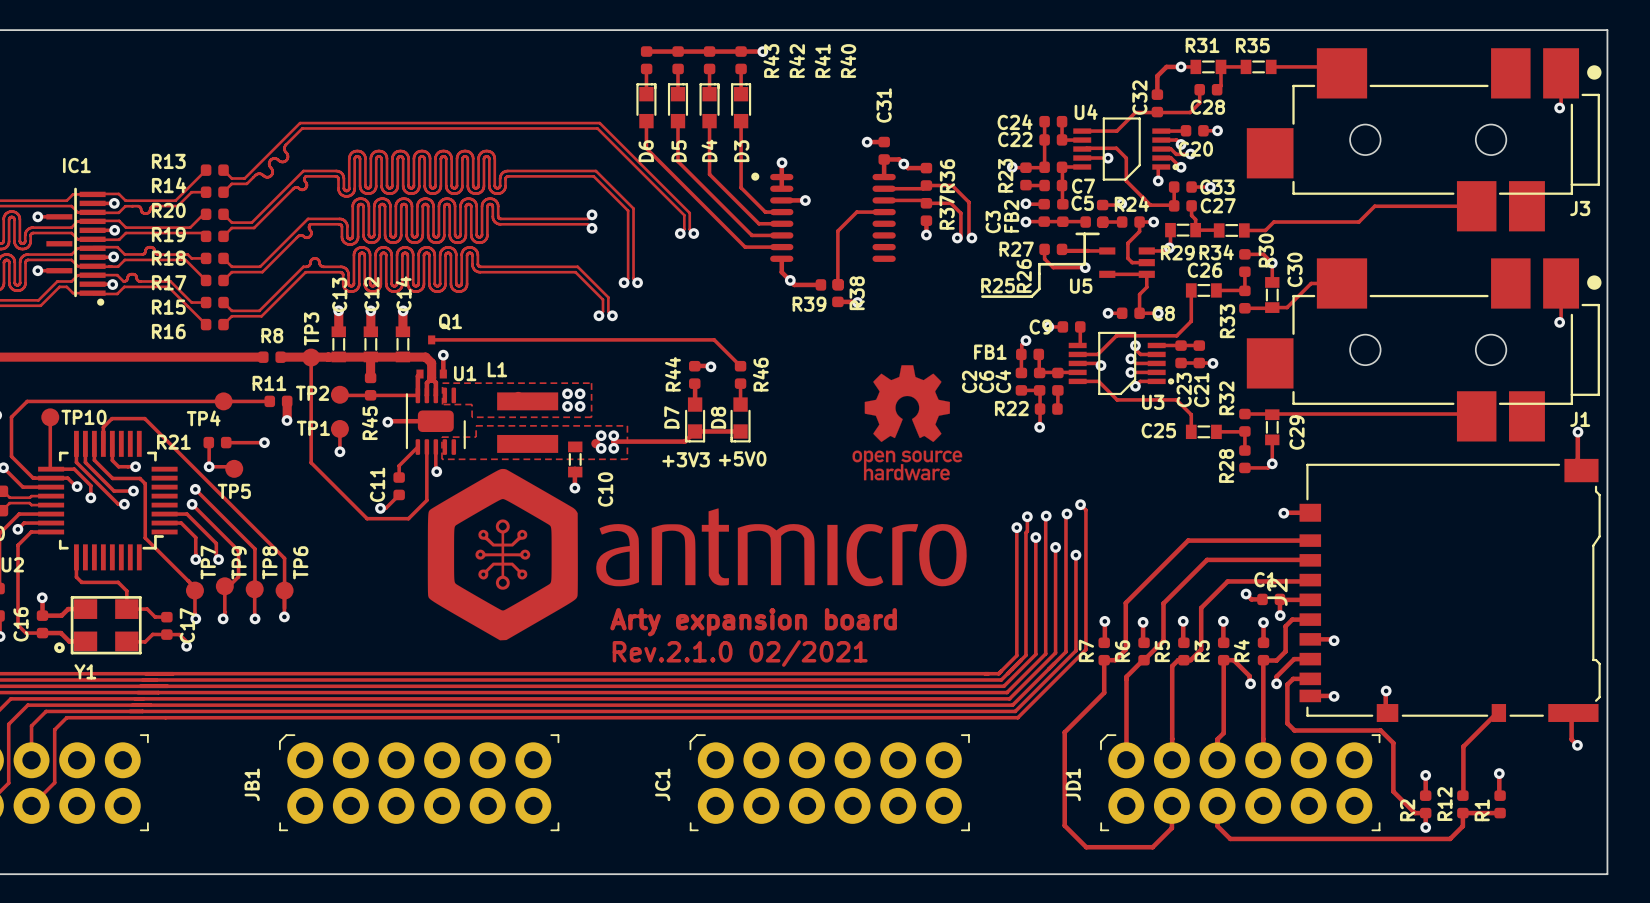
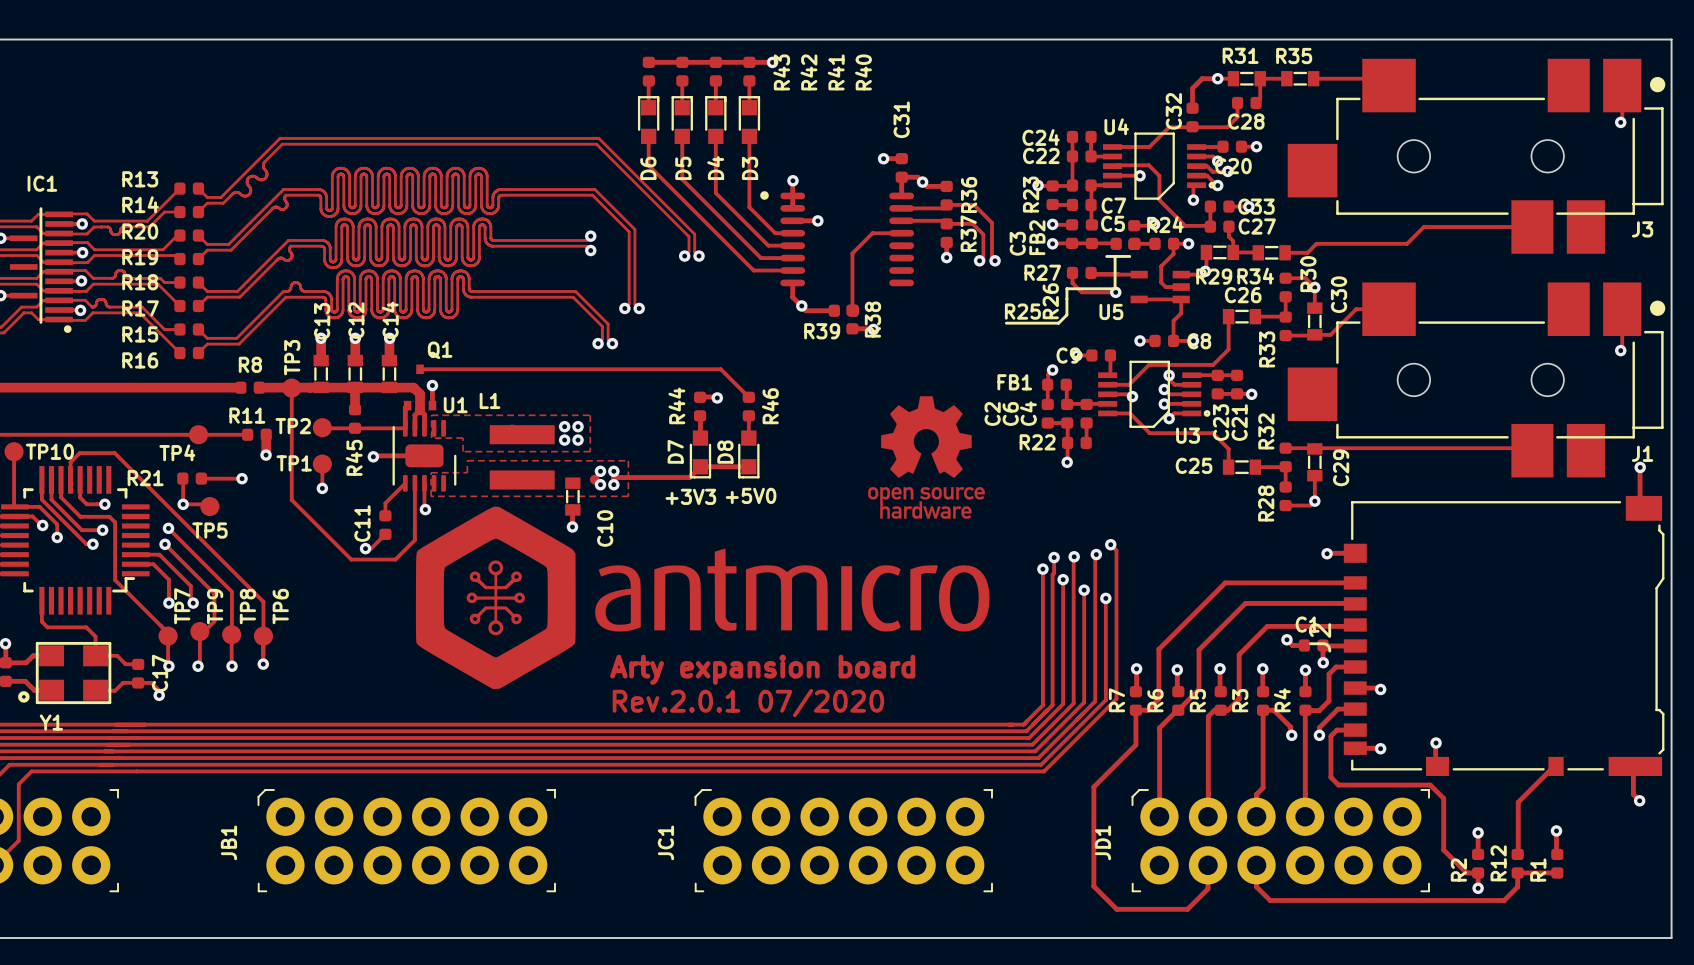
text: Rev.2.1.0 02/2021 (740, 653) -> Rev.2.0.1 07/2020 (748, 703)

